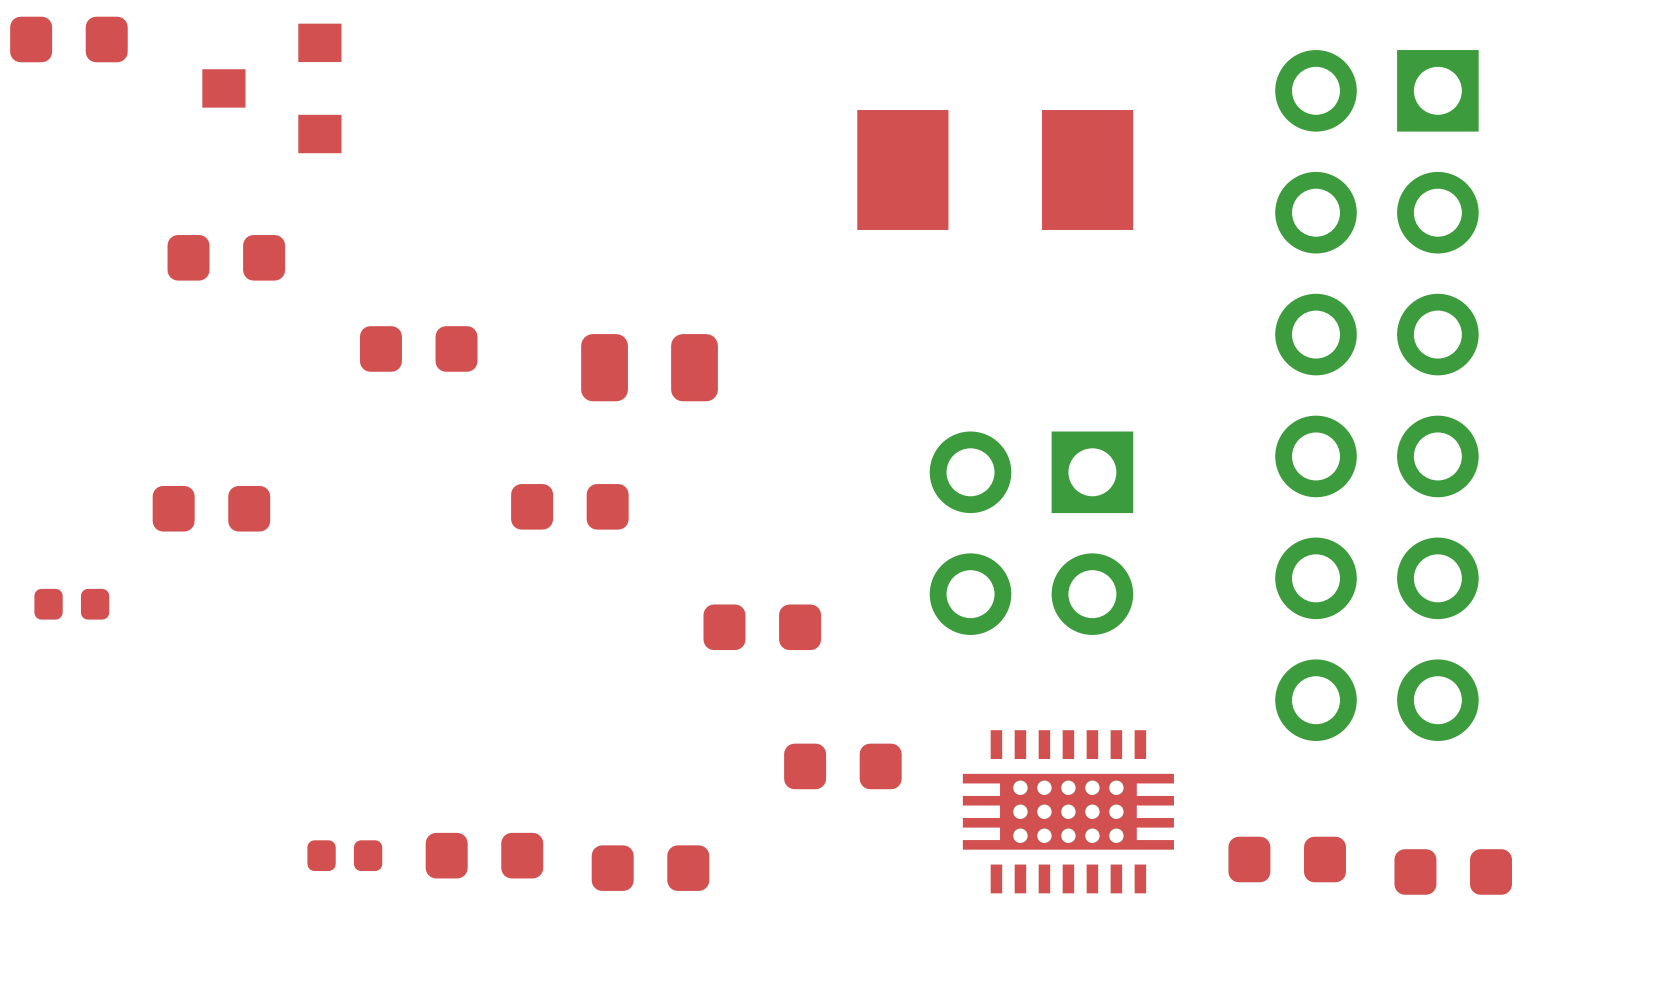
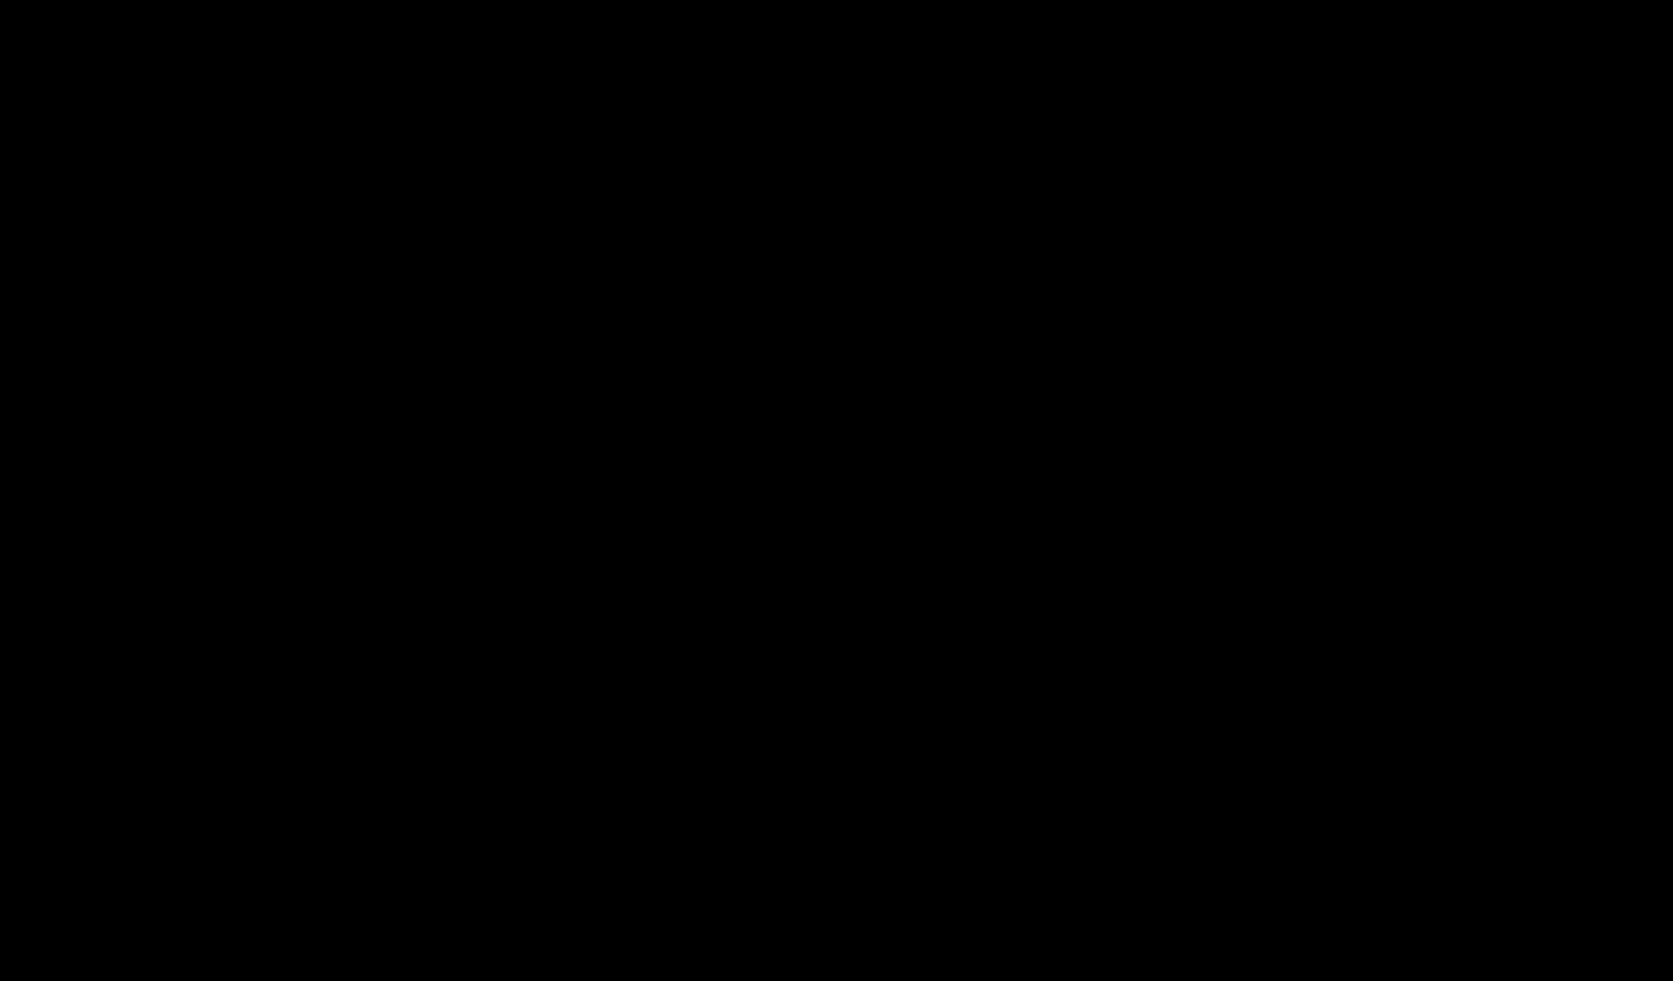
part: (68, 39) -> none
part: (271, 88) -> none
part: (995, 170) -> none
part: (226, 257) -> none
part: (418, 348) -> none
part: (649, 367) -> none
part: (1376, 395) -> none
part: (569, 506) -> none
part: (211, 508) -> none
part: (1031, 533) -> none
part: (71, 604) -> none
part: (762, 627) -> none
part: (842, 766) -> none
part: (1068, 811) -> none
part: (344, 855) -> none
part: (484, 855) -> none
part: (1287, 859) -> none
part: (650, 868) -> none
part: (1453, 871) -> none

